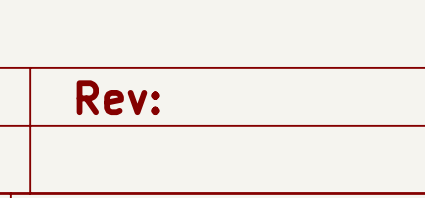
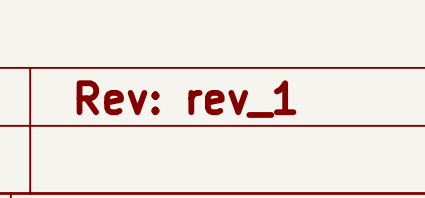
title block: Rev: (118, 97) -> Rev: rev_1 (186, 99)

